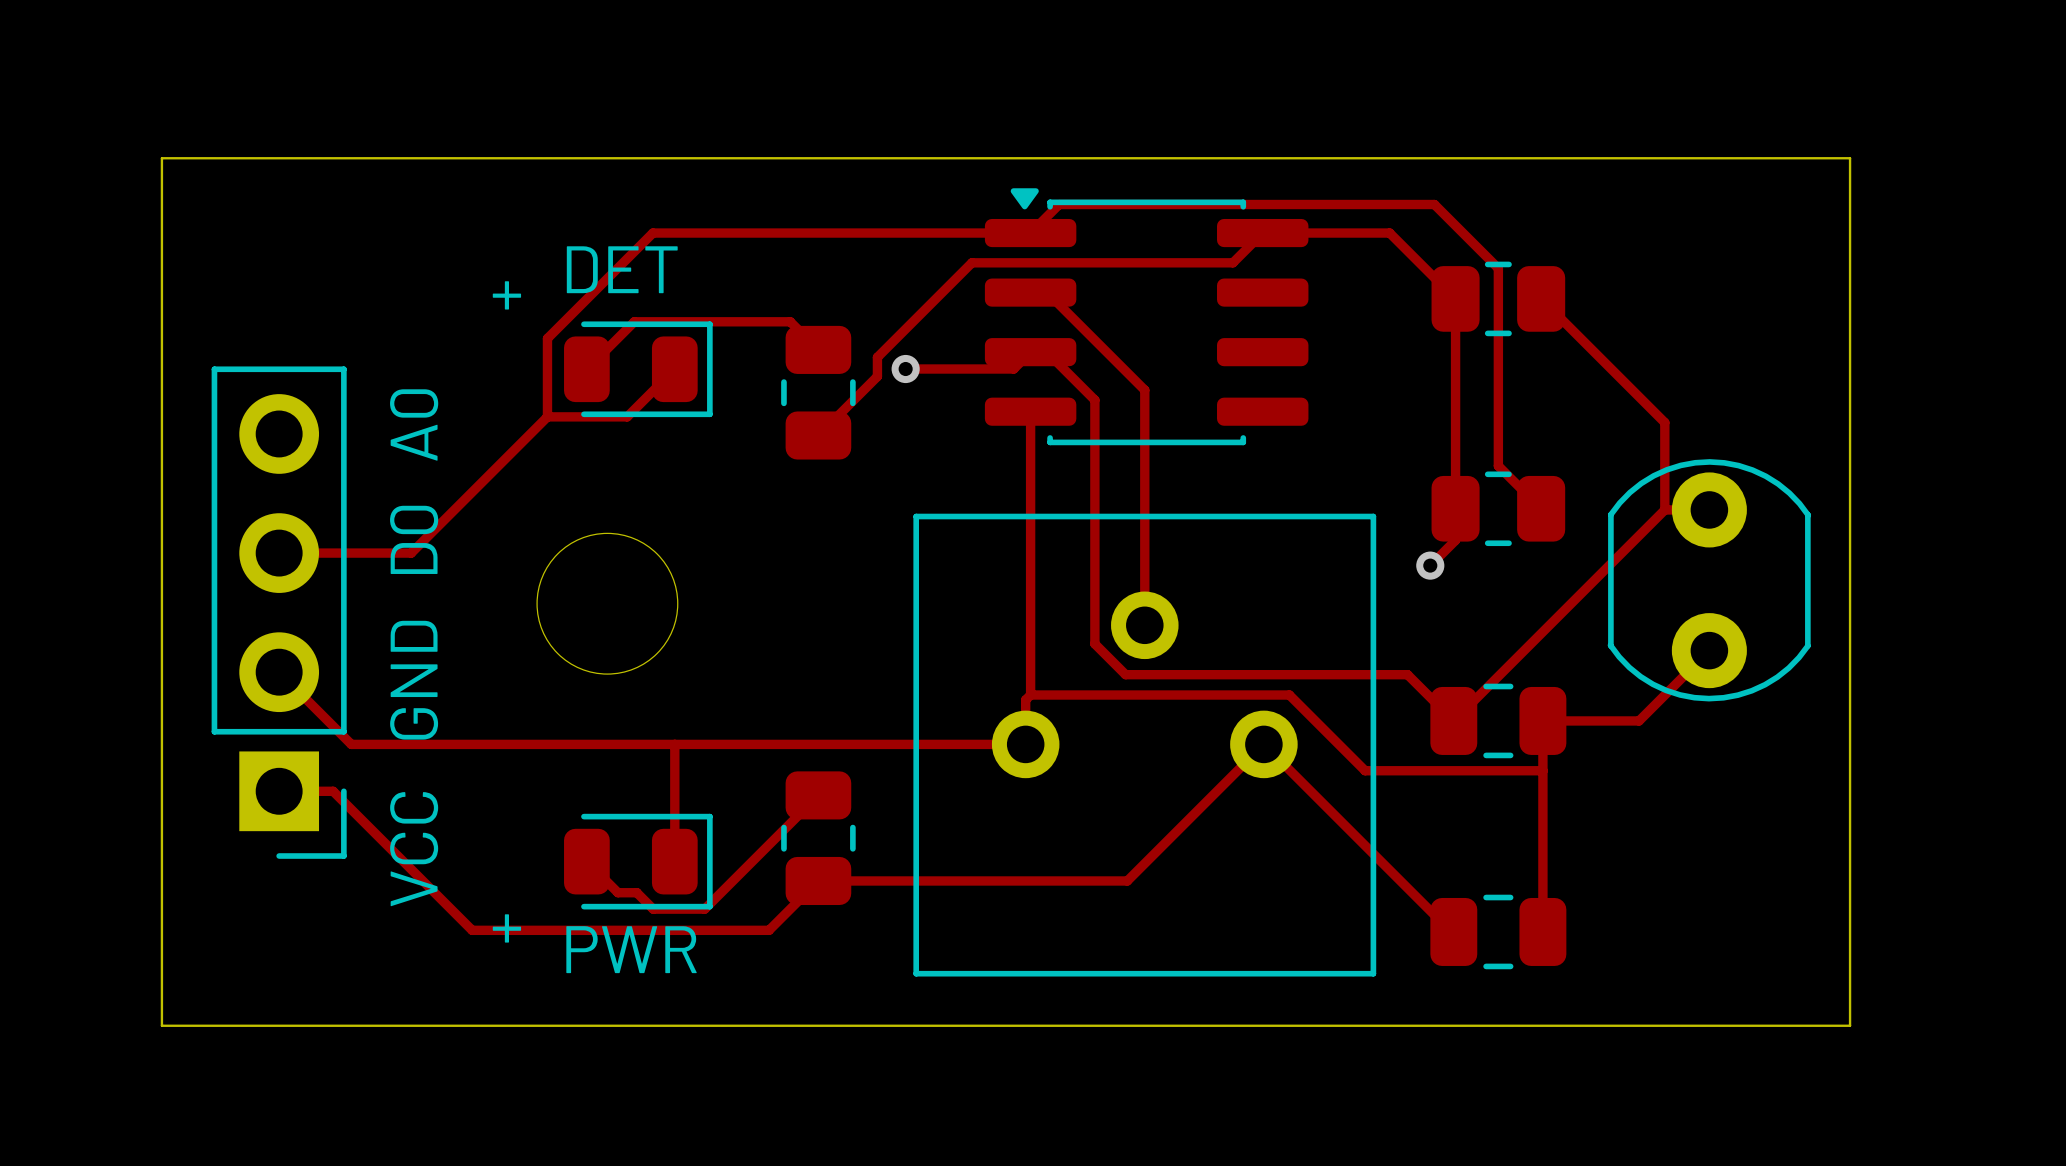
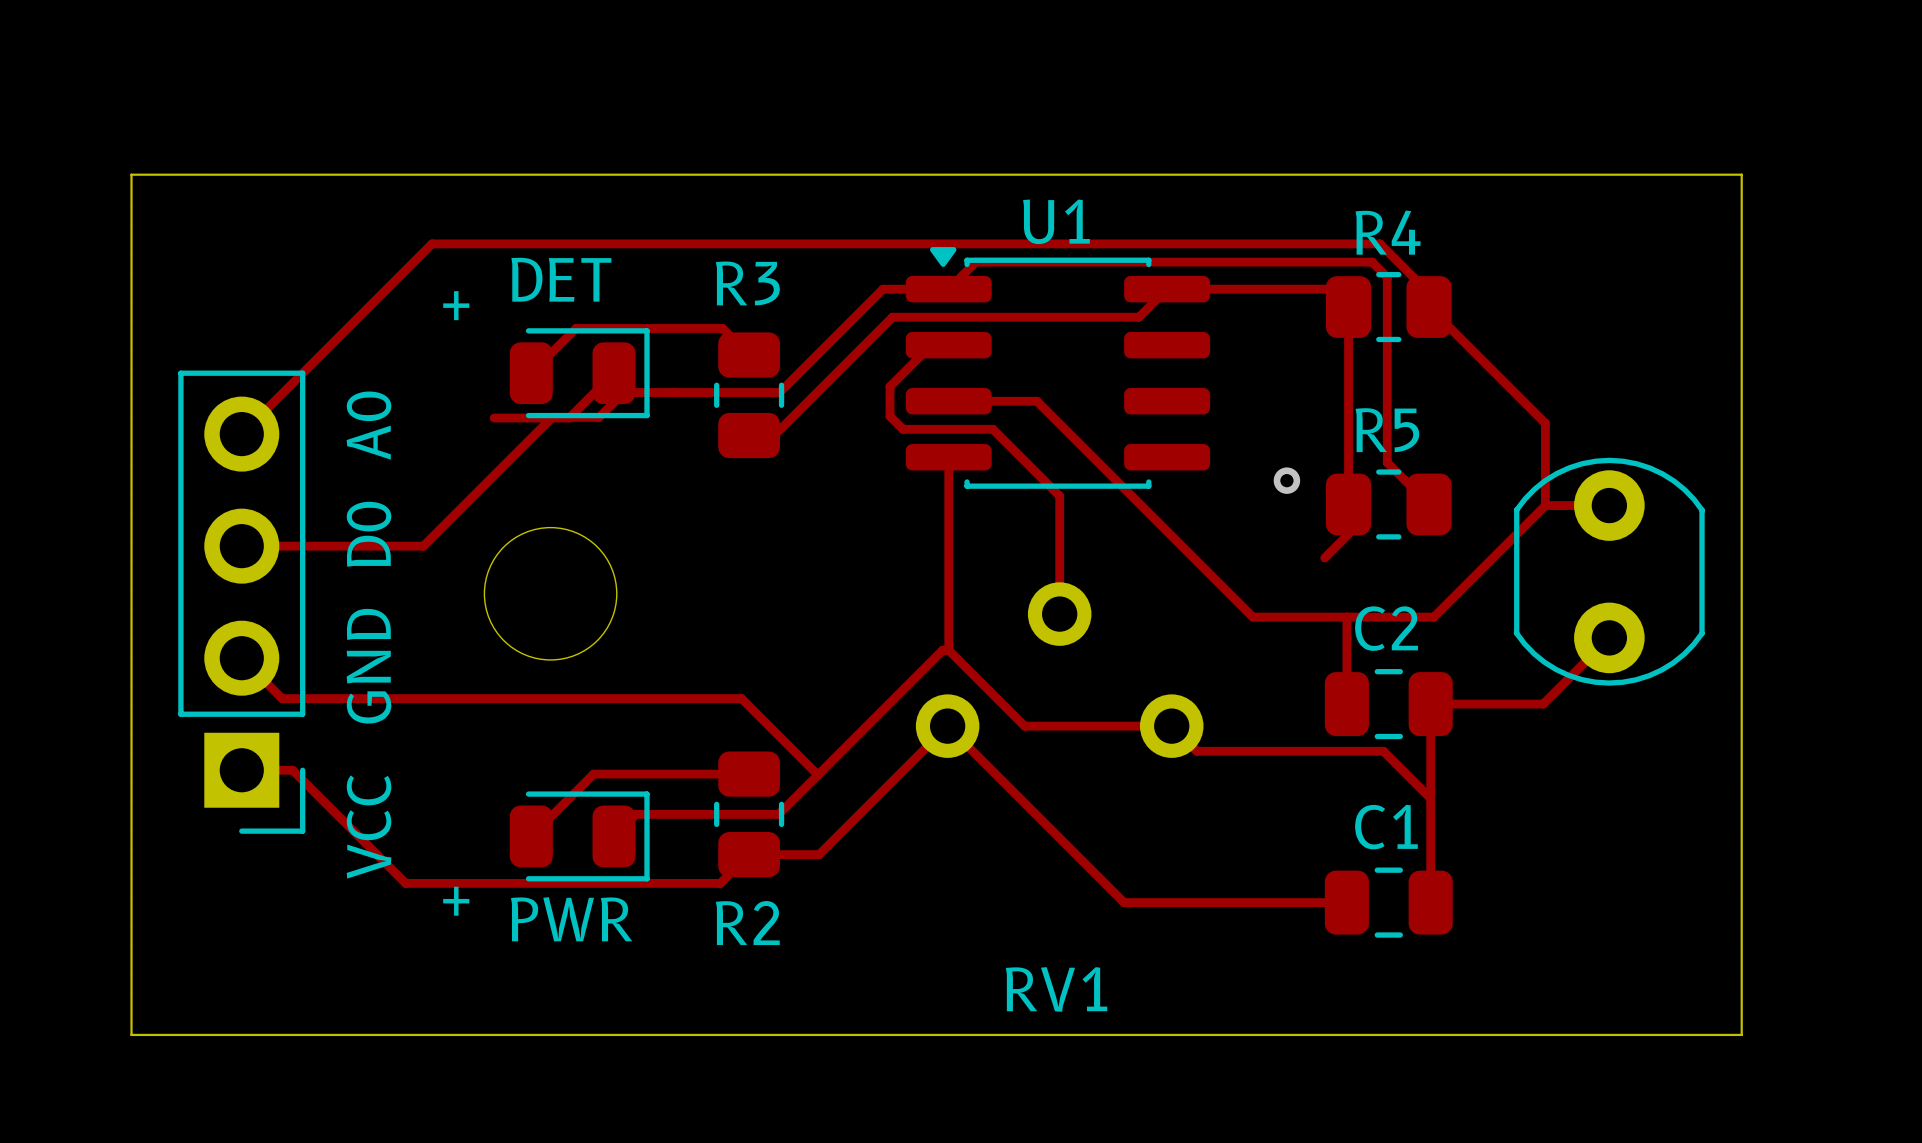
board edge: (1850, 158) (1850, 1025) (161, 1025) -> (1719, 174) (1741, 174) (1741, 1034) (131, 1034) (131, 990)
U1 name: none -> U1 (1056, 221)
R4 name: none -> R4 (1388, 232)
R3 name: none -> R3 (747, 283)
track: (1436, 279) (1389, 233) (1262, 233) (1232, 262) (971, 262) (877, 357) (877, 376) (818, 435) -> (1330, 289) (1167, 289) (1139, 317) (892, 317) (774, 435) (749, 435)
track: (1030, 292) (1047, 292) (1144, 390) (1144, 625) -> none
track: none -> (1429, 307) (1429, 292) (1379, 243) (431, 243) (241, 434)
U1 position: (1146, 316) -> (1057, 367)
track: none -> (948, 345) (931, 345) (890, 386) (890, 416) (903, 429) (992, 429) (1059, 496) (1059, 614)
track: (905, 369) (1013, 369) (1030, 352) (1046, 352) (1094, 400) (1094, 643) (1125, 674) (1407, 674) (1453, 720) (1546, 628) -> (948, 401) (1036, 401) (1252, 617) (1433, 617)
via: (905, 369) -> none
track: (1030, 411) (1030, 458) -> none
R5 name: none -> R5 (1387, 430)
track: (1498, 465) (1498, 268) (1434, 204) (1059, 204) (1030, 233) (652, 233) (547, 338) (547, 416) (411, 553) -> (1388, 464) (1387, 277) (1372, 262) (975, 262) (948, 289) (882, 289) (779, 392) (623, 392) (599, 417) (552, 417) (423, 546) (366, 546)
via position: (1430, 565) -> (1286, 480)
part position: (1709, 580) -> (1609, 571)
track: none -> (1346, 617) (1346, 704)
C2 name: none -> C2 (1386, 628)
track: (1709, 650) (1639, 720) -> (1609, 637) (1543, 704) (1521, 704)
track: (1030, 663) (1030, 695) -> none
track: (1030, 695) (1025, 699) (1025, 744) (351, 744) (322, 715) -> (817, 775) (741, 698) (282, 698)
track: (1030, 695) (1289, 695) (1365, 770) (1542, 770) -> none
track: (674, 744) (674, 861) -> (1430, 798) (1383, 751) (1196, 751) (1171, 726) (1024, 726) (948, 650) (942, 650) (778, 814) (636, 814) (614, 836)
RV1 side: top (1144, 745) -> bottom (1059, 670)
track: (818, 795) (704, 909) (653, 909) (636, 892) (617, 892) (586, 861) -> (749, 774) (593, 774) (531, 836)
C1 name: none -> C1 (1386, 827)
track: (892, 880) (1127, 880) (1263, 744) (1451, 931) -> (819, 854) (947, 726) (1124, 902) (1344, 902)
track: (453, 911) (472, 930) (769, 930) (787, 911) -> (405, 883) (720, 883)
R2 name: none -> R2 (747, 923)

